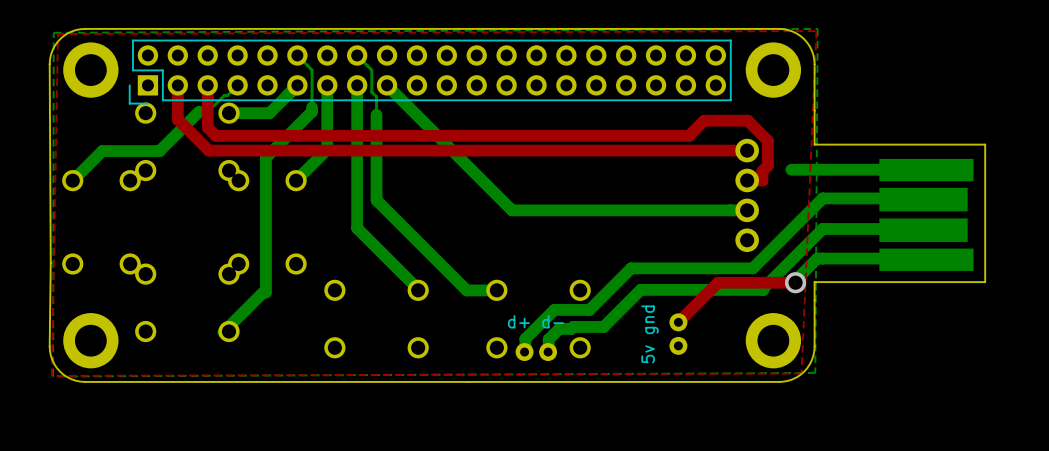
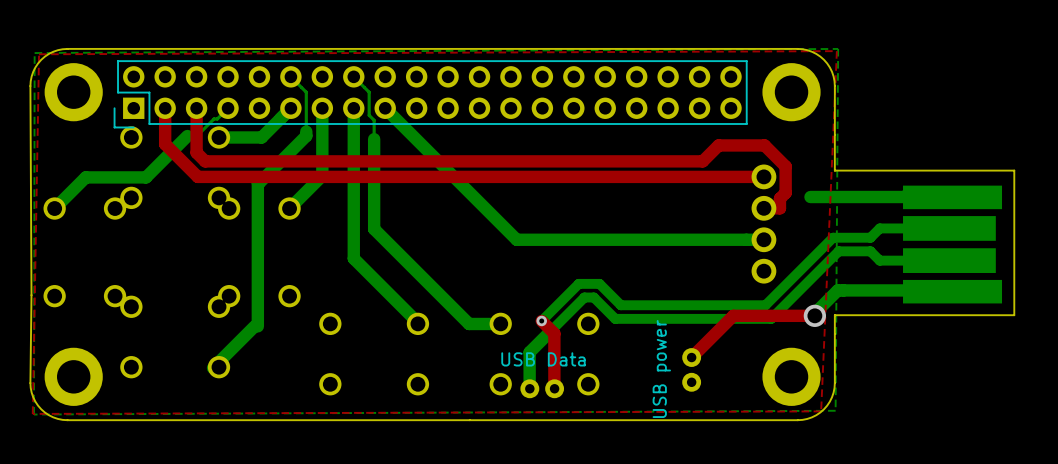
bottom track: (878, 198) (822, 198) (752, 268) (631, 268) (589, 309) (554, 309) (525, 338) (525, 351) -> none
bottom track: none -> (949, 228) (879, 228) (870, 237) (833, 237) (765, 305) (620, 305) (599, 283) (578, 283) (541, 320)
bottom track: (878, 229) (822, 229) (763, 289) (640, 289) (603, 326) (559, 328) (548, 339) (548, 352) -> none
bottom track: none -> (949, 260) (879, 260) (870, 251) (838, 251) (771, 318) (615, 318) (593, 297) (584, 297) (529, 352) (529, 386)
top track: none -> (541, 320) (554, 333) (554, 386)
via: none -> (541, 320)
part value: d+ d- (536, 321) -> USB Data (543, 359)
part value: 5v gnd (650, 334) -> USB power (661, 369)

